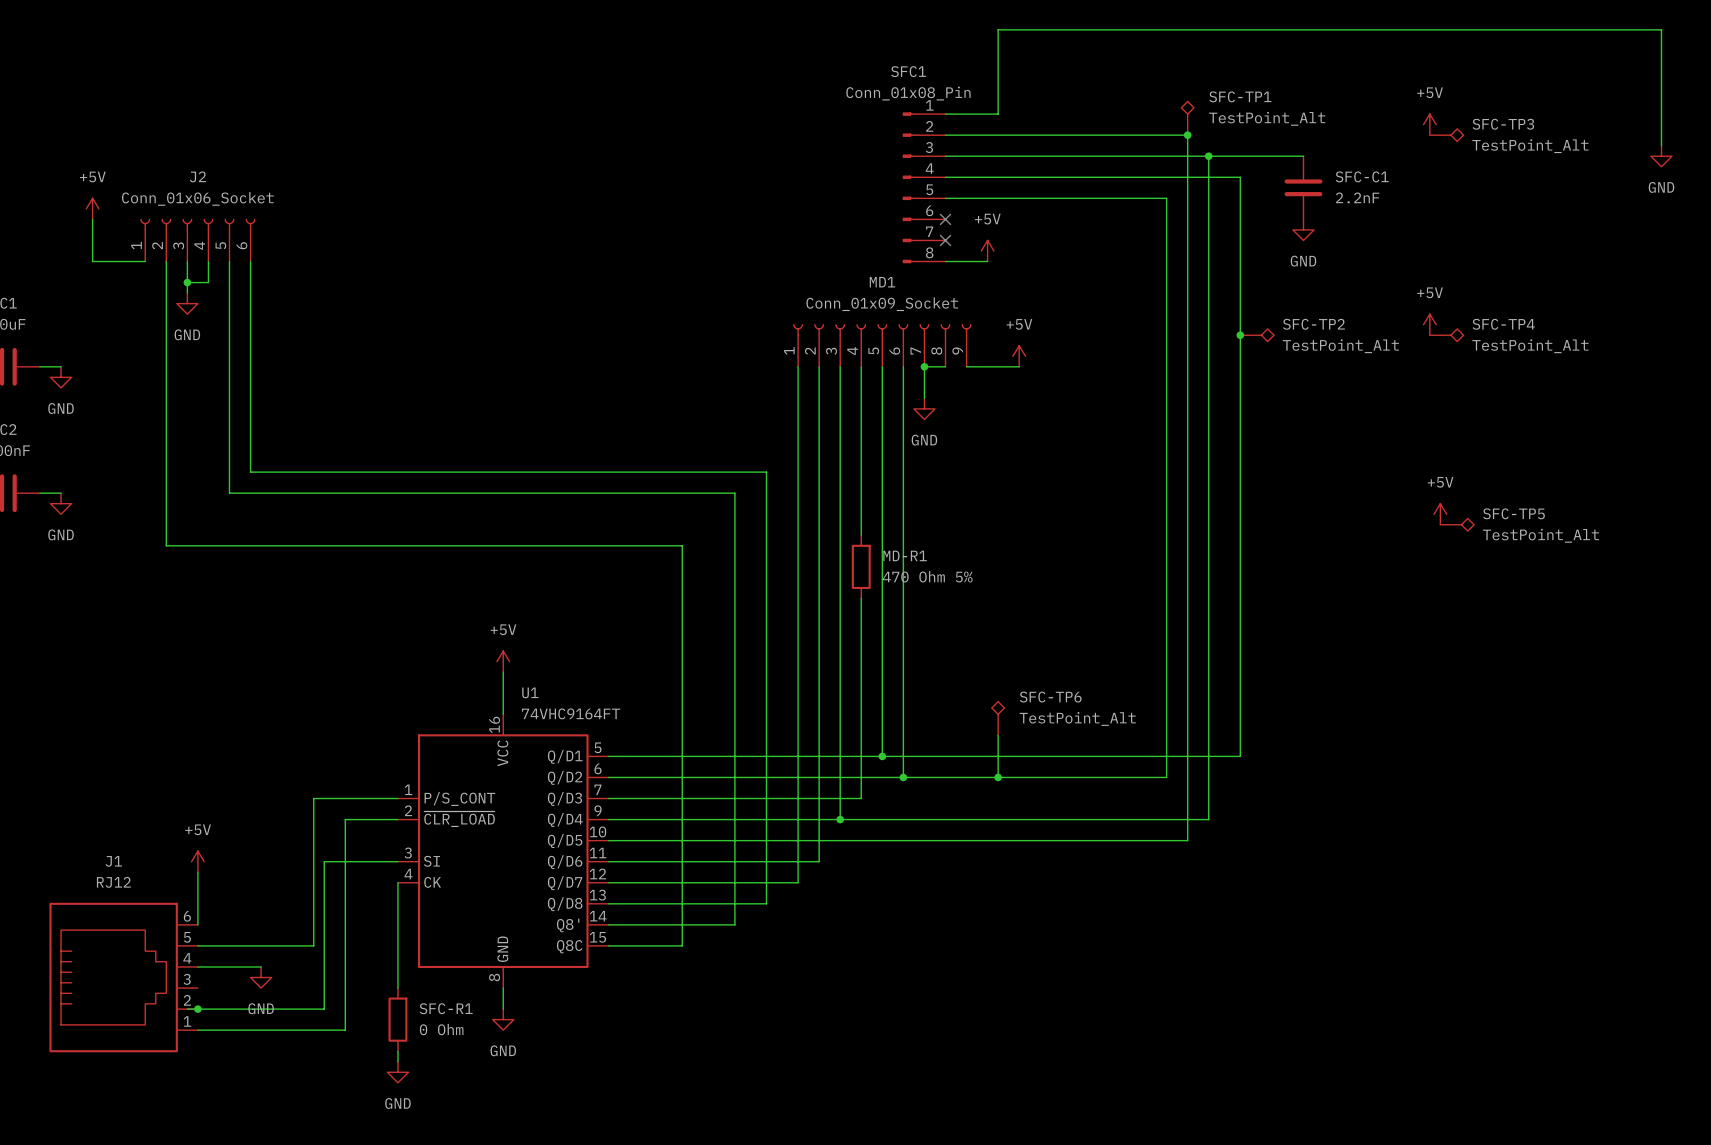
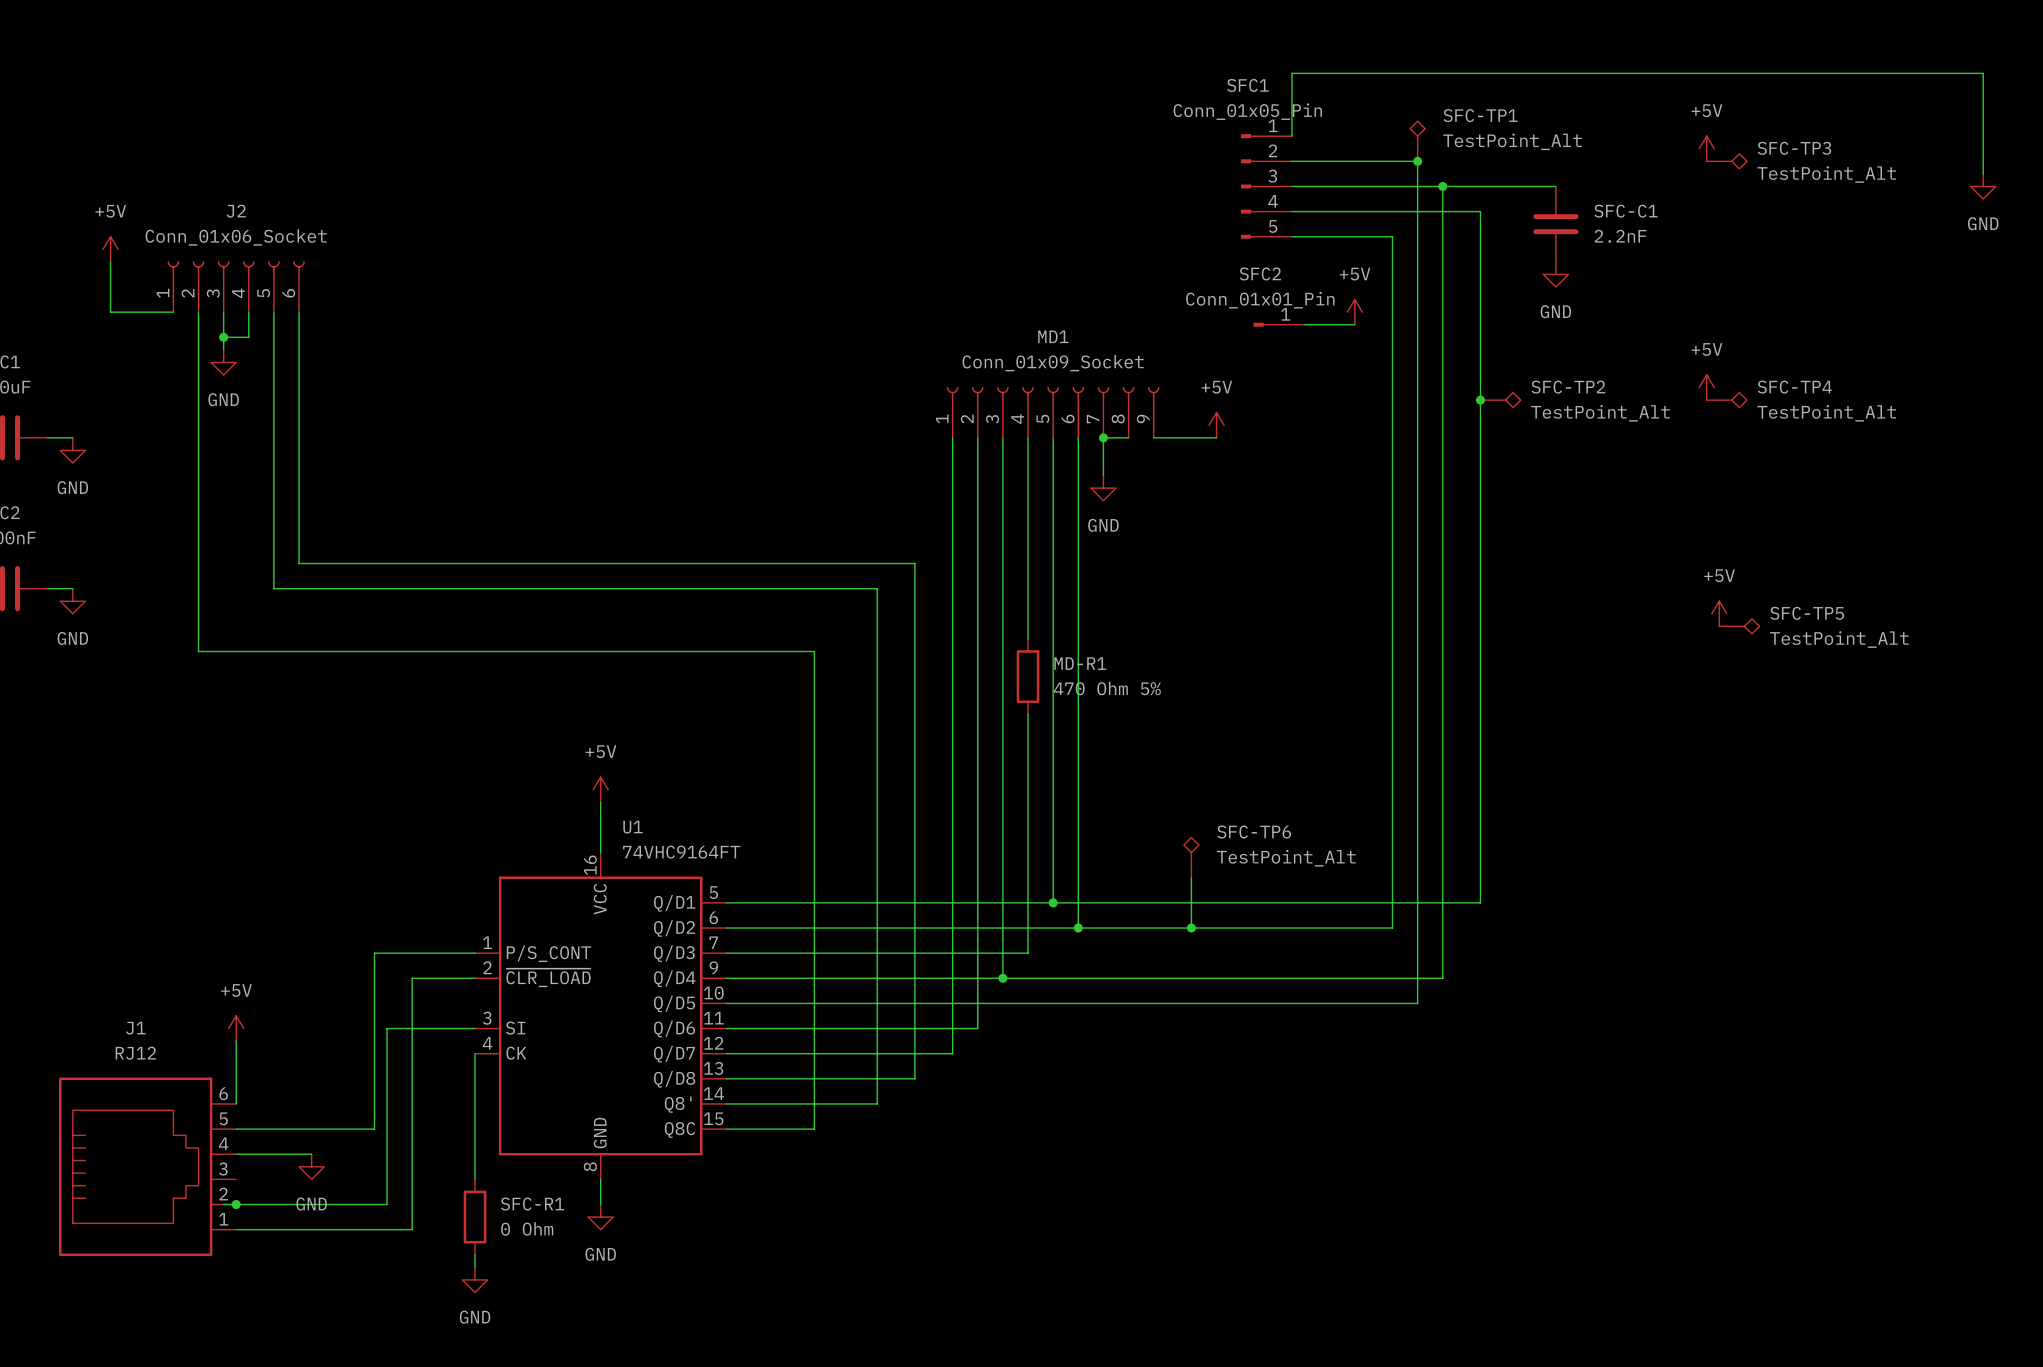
wire: (1661, 61) (1661, 29) (998, 29) (998, 114) (945, 114) -> (1983, 73) (1291, 73) (1291, 136)
SFC1 name position: SFC1 (908, 71) -> SFC1 (1247, 85)
SFC1 value: Conn_01x08_Pin (908, 93) -> Conn_01x05_Pin (1247, 111)
SFC1 symbol: [902, 112, 946, 264] -> [1240, 134, 1292, 239]
wire: (945, 135) (1082, 135) -> none
wire: (945, 156) (1082, 156) -> none
wire: (945, 177) (1082, 177) -> none
wire: (945, 198) (1082, 198) -> none
no-connect mark: (945, 219) -> none
no-connect mark: (945, 240) -> none
power symbol position: +5V (987, 250) -> +5V (1354, 312)
wire: (945, 261) (987, 261) -> (1304, 324) (1354, 324)
SFC2: none -> Conn_01x01_Pin (1279, 324)

